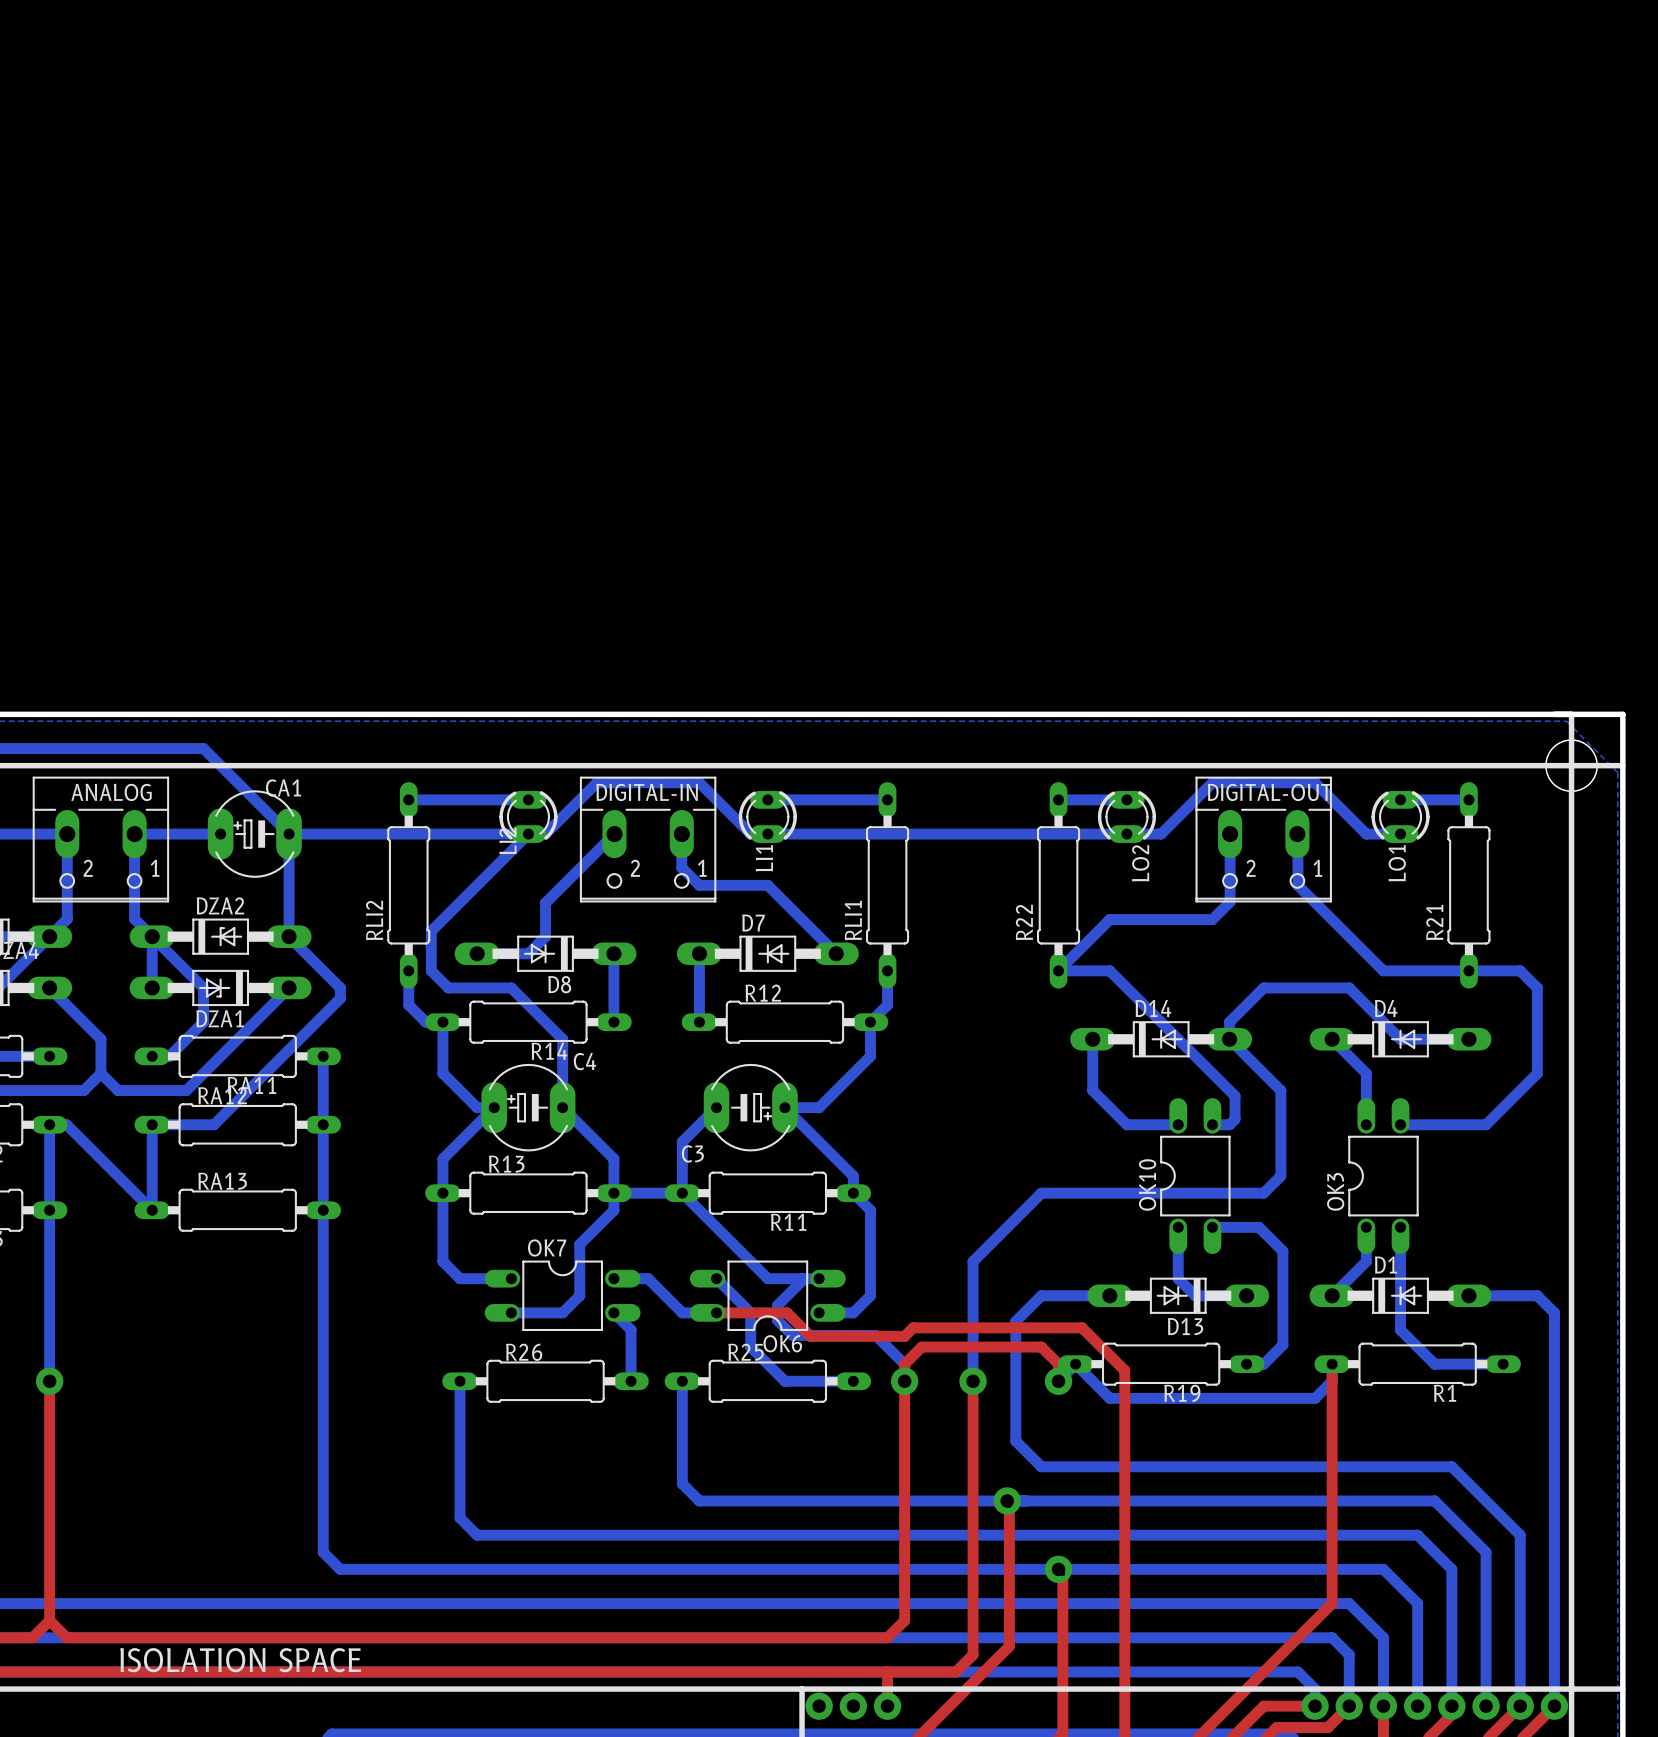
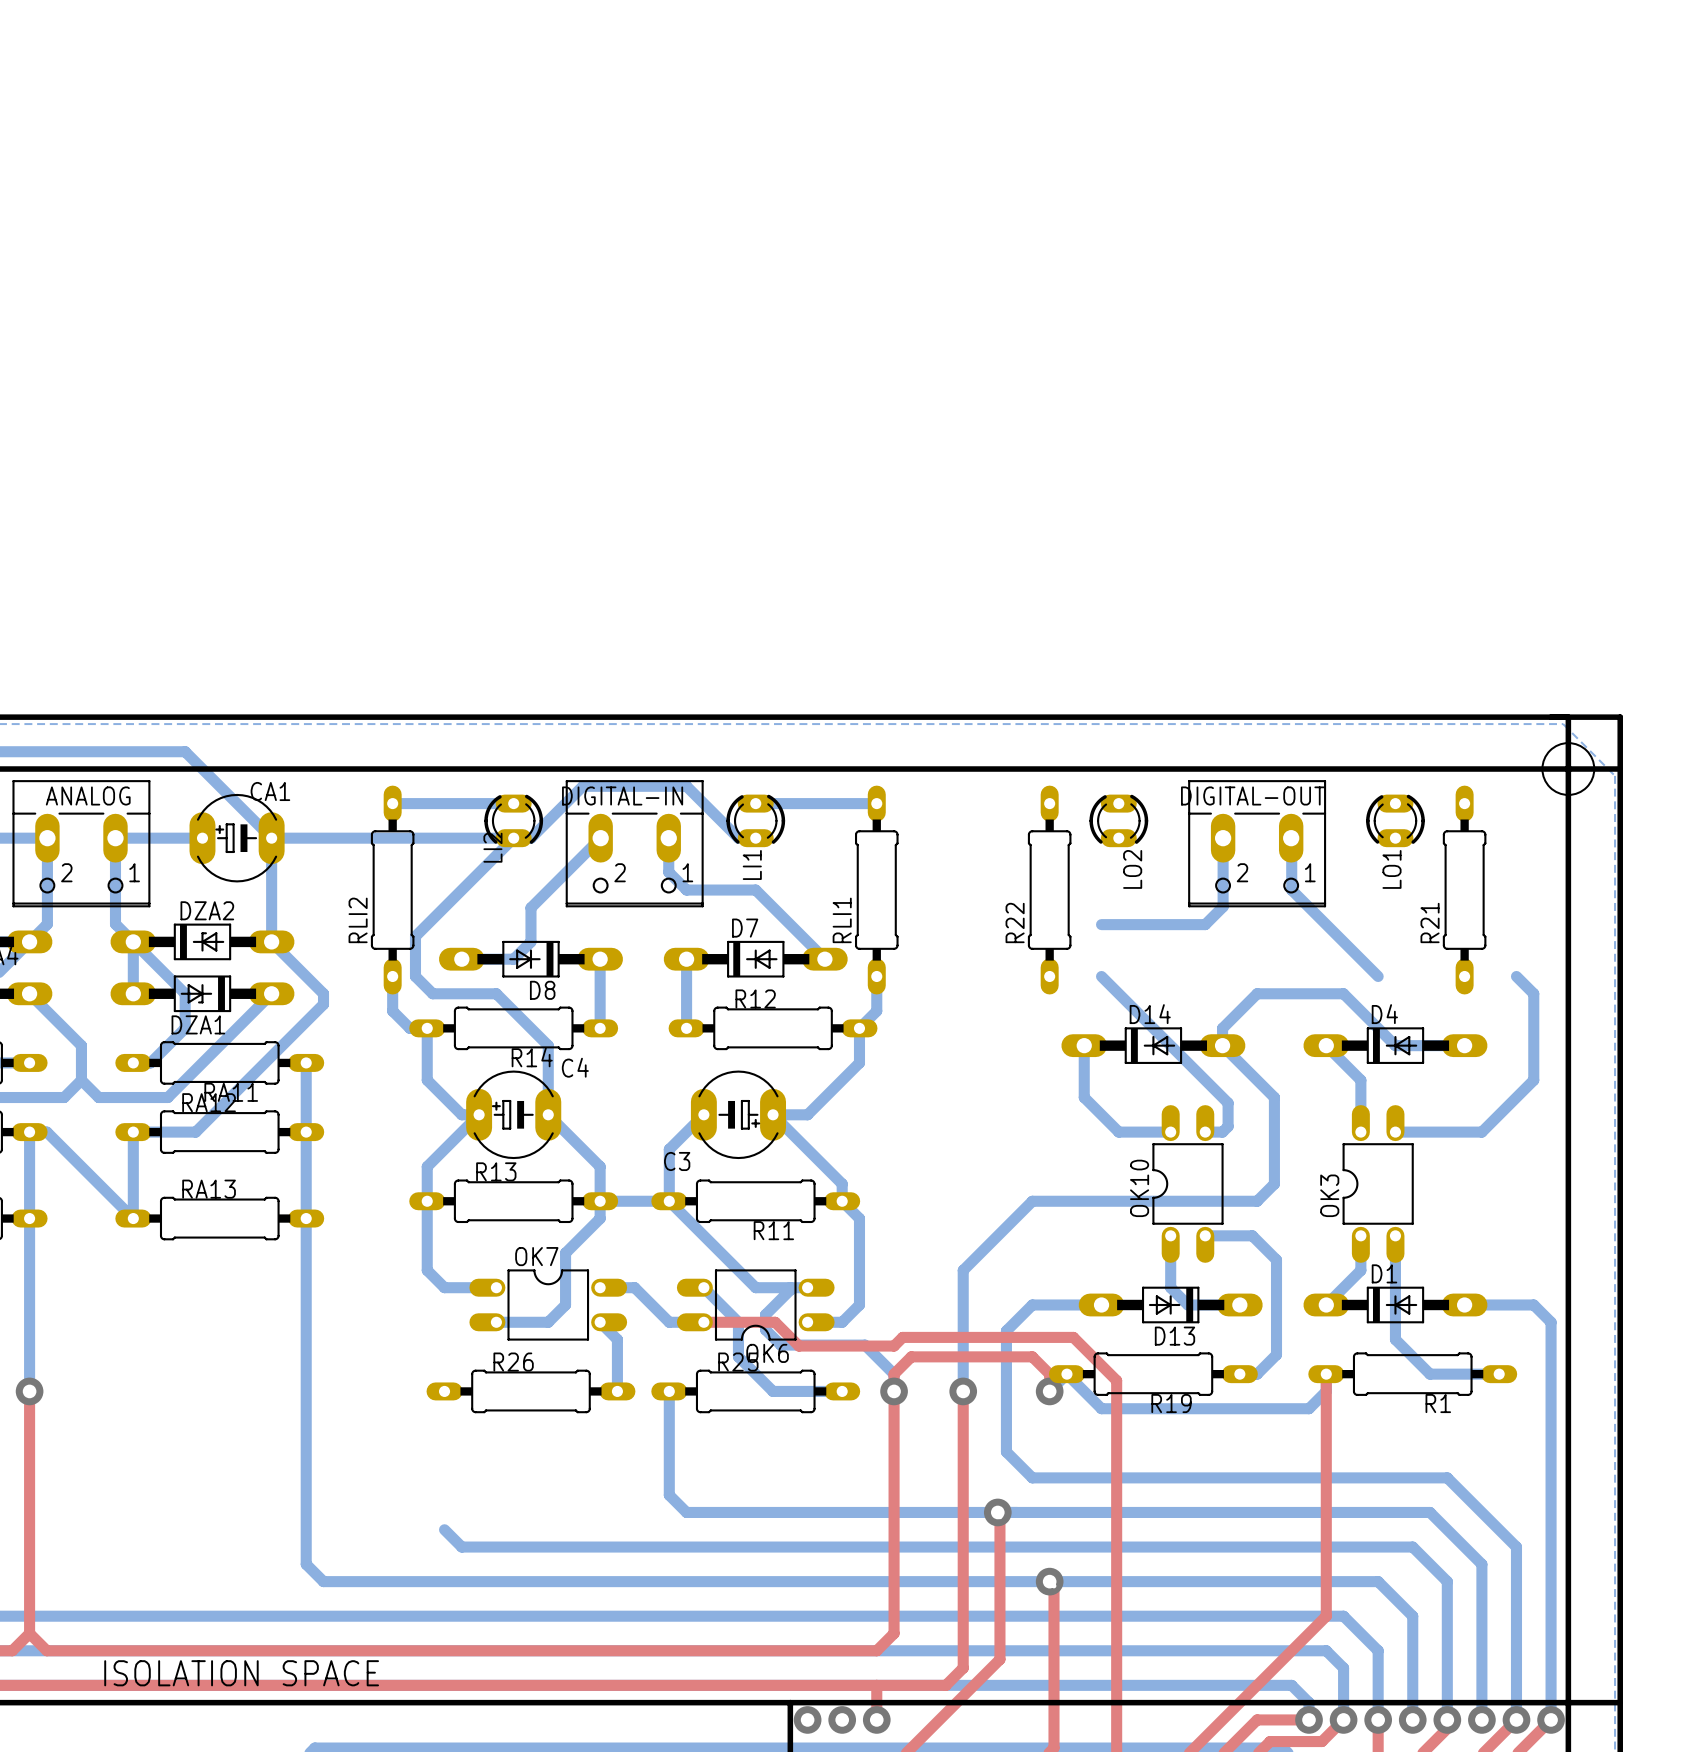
bottom track: (1058, 799) (1126, 799) -> none
bottom track: (1400, 799) (1468, 799) -> none
bottom track: (767, 834) (1161, 834) (1212, 782) (1315, 782) (1366, 834) (1400, 834) -> none
bottom track: (1109, 919) (1058, 970) (1109, 970) -> none
bottom track: (1383, 970) (1520, 970) -> none
bottom track: (460, 1381) (460, 1518) -> none

